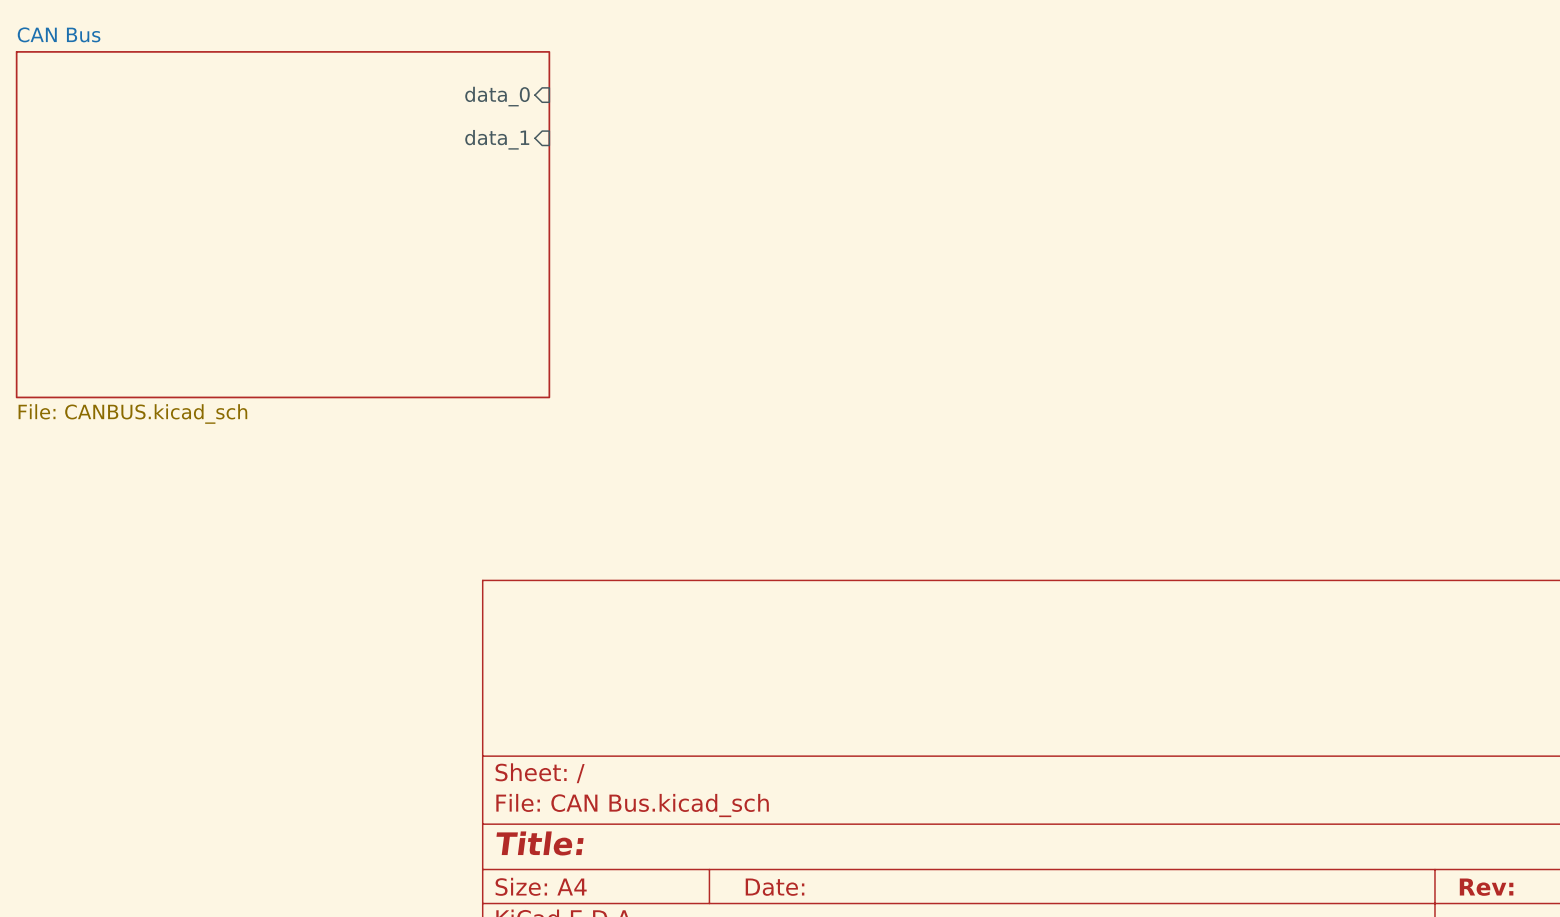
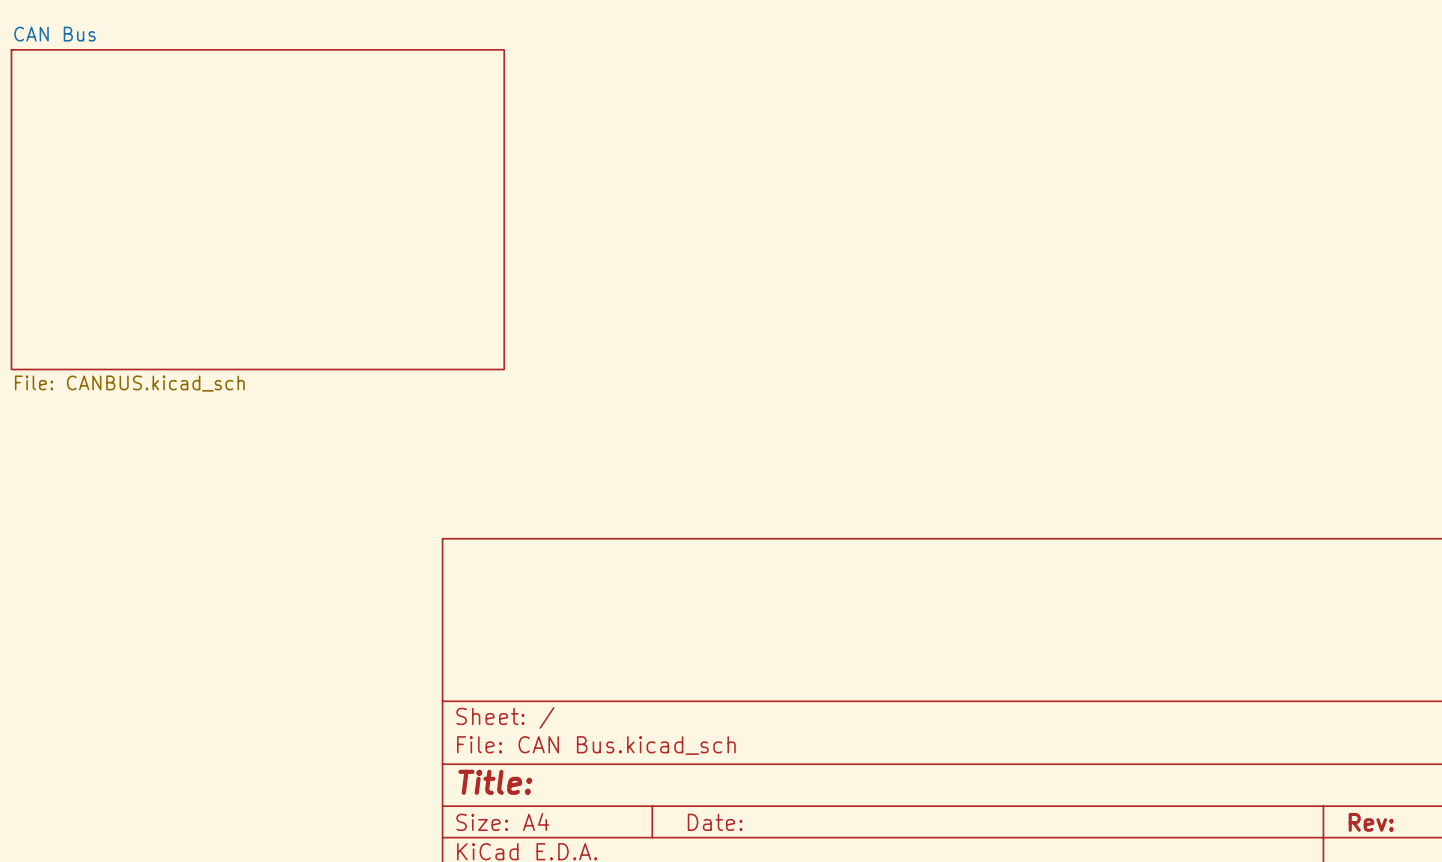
sheet pin: data_0 (497, 96) -> none
sheet pin: data_1 (497, 139) -> none

